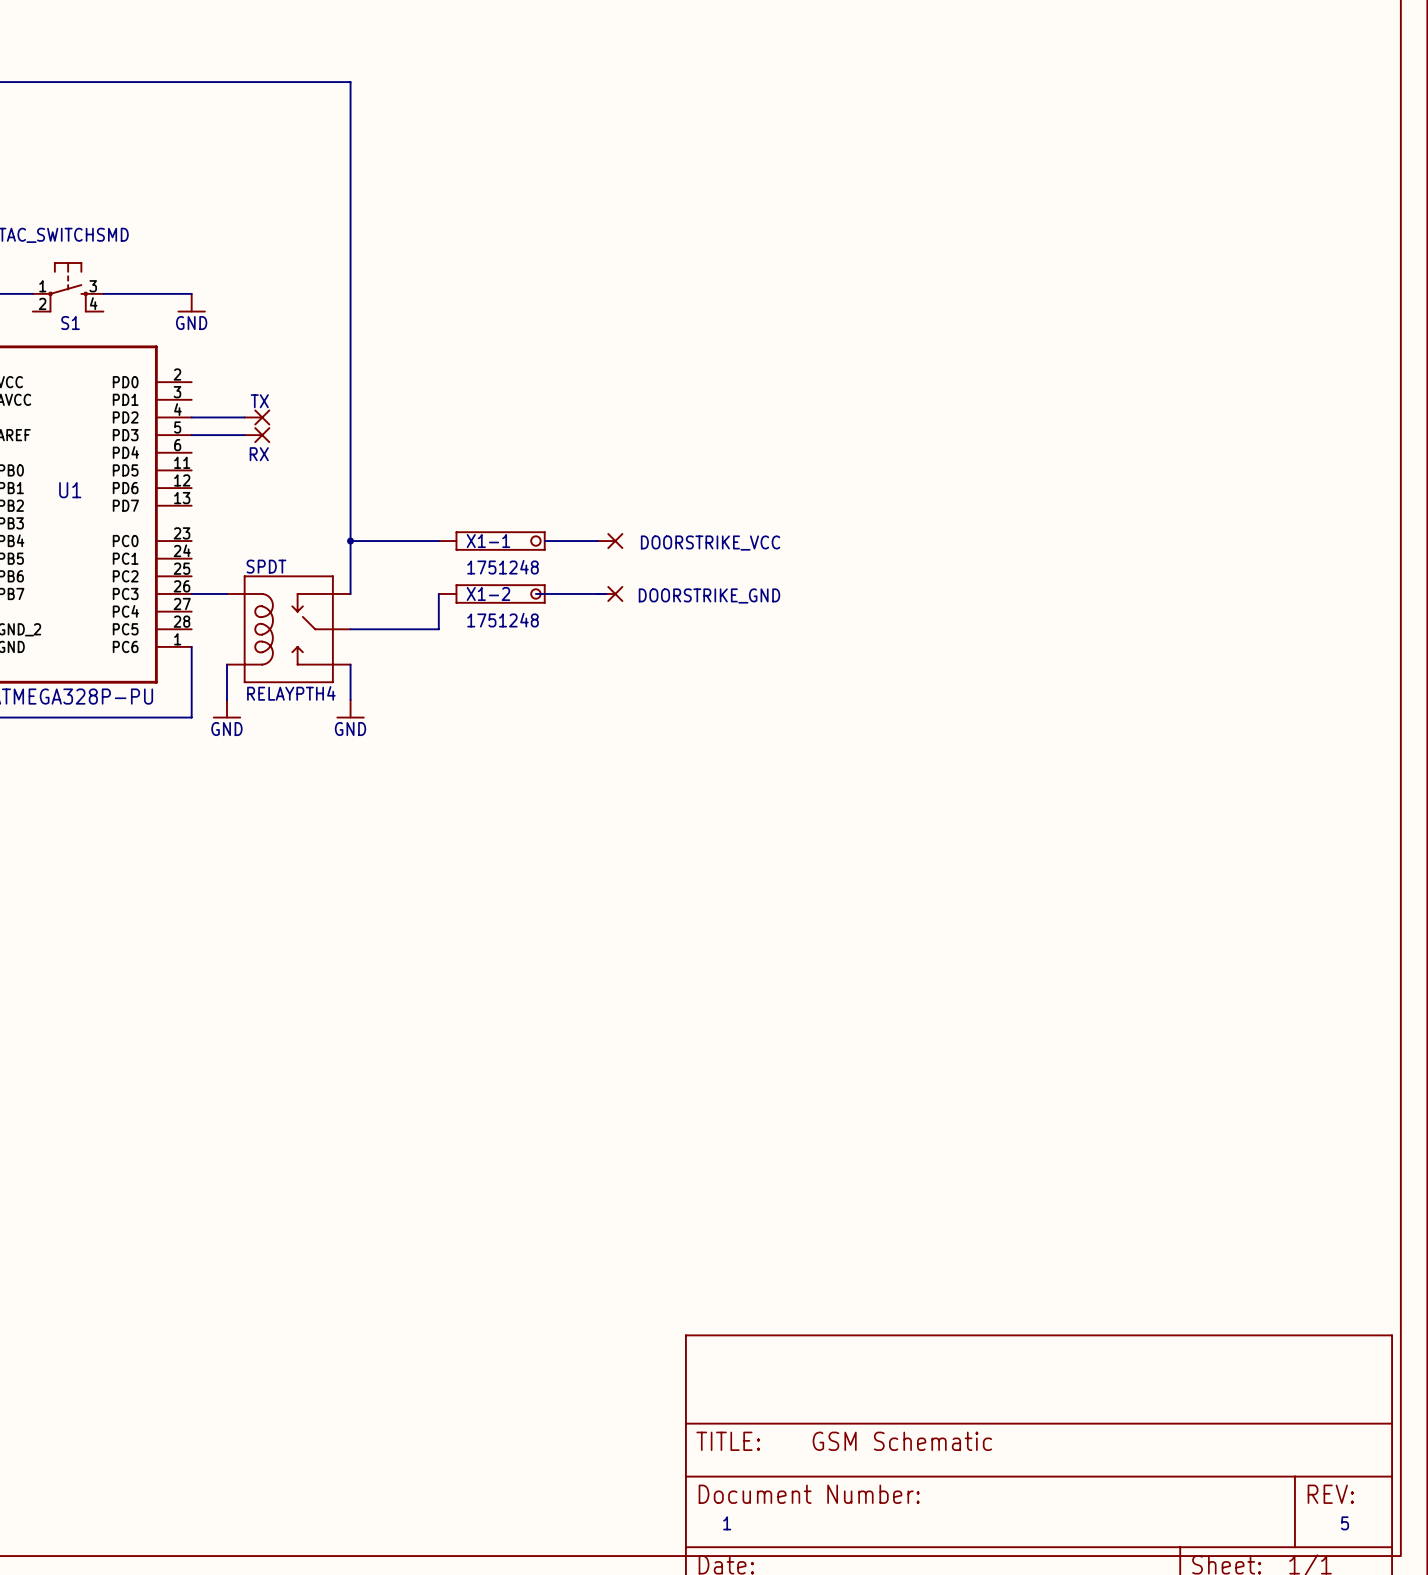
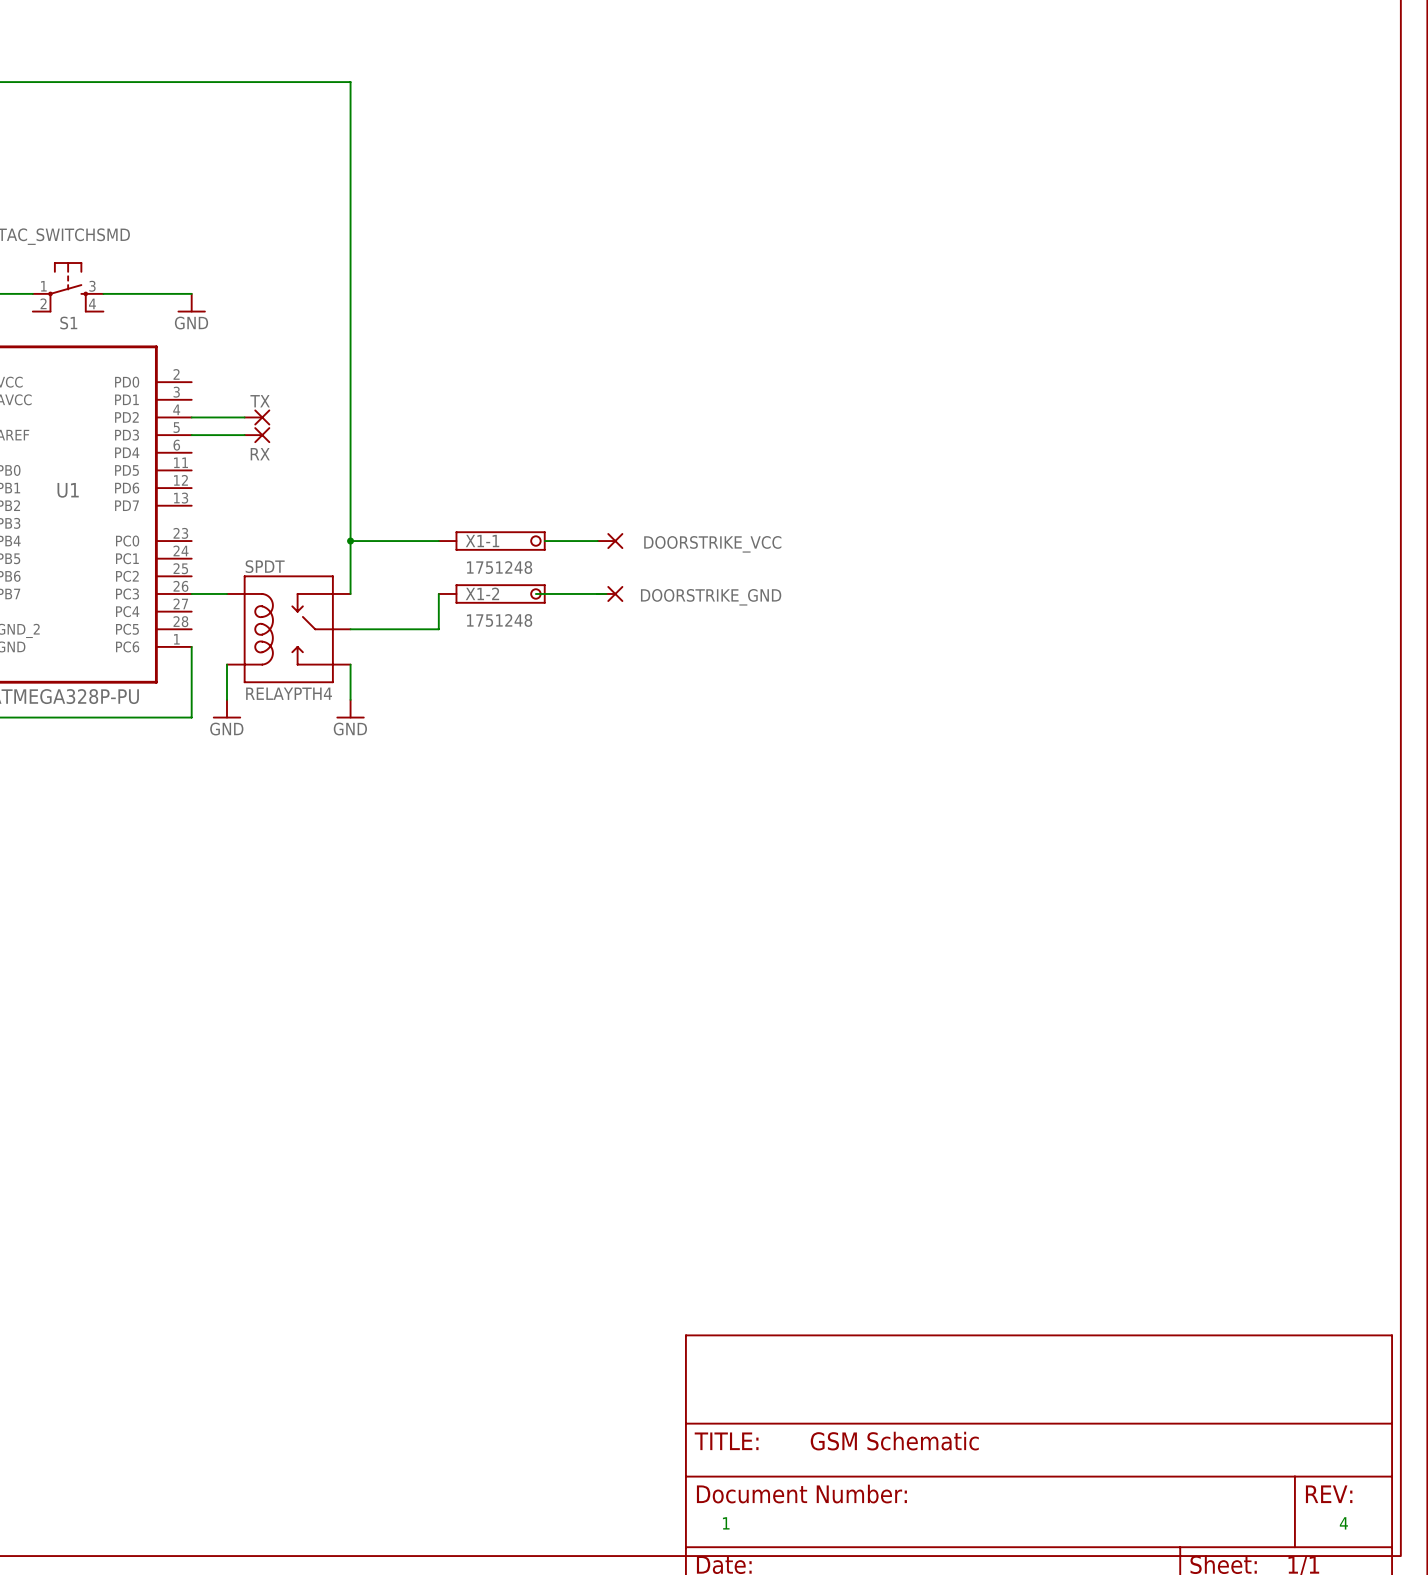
text: 5 (1345, 1523) -> 4 (1343, 1523)

